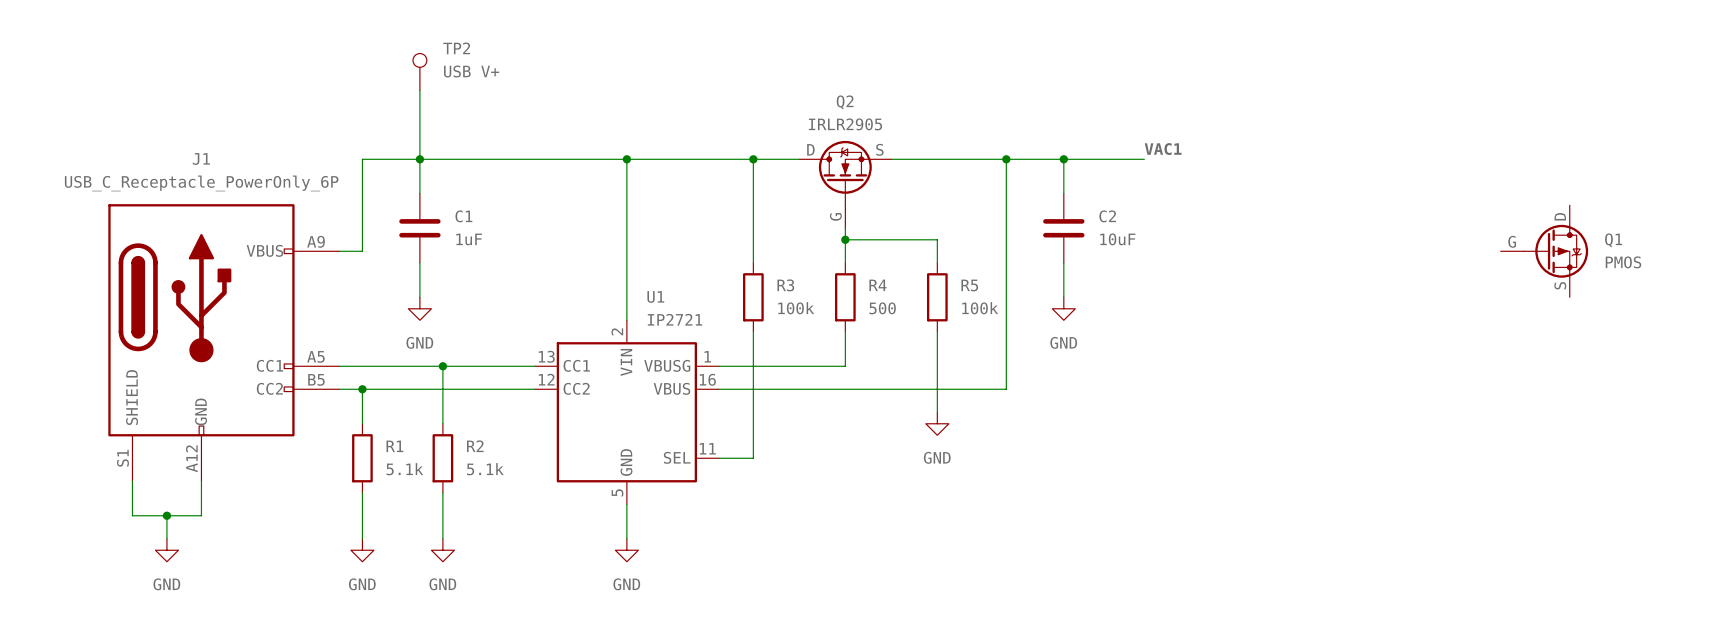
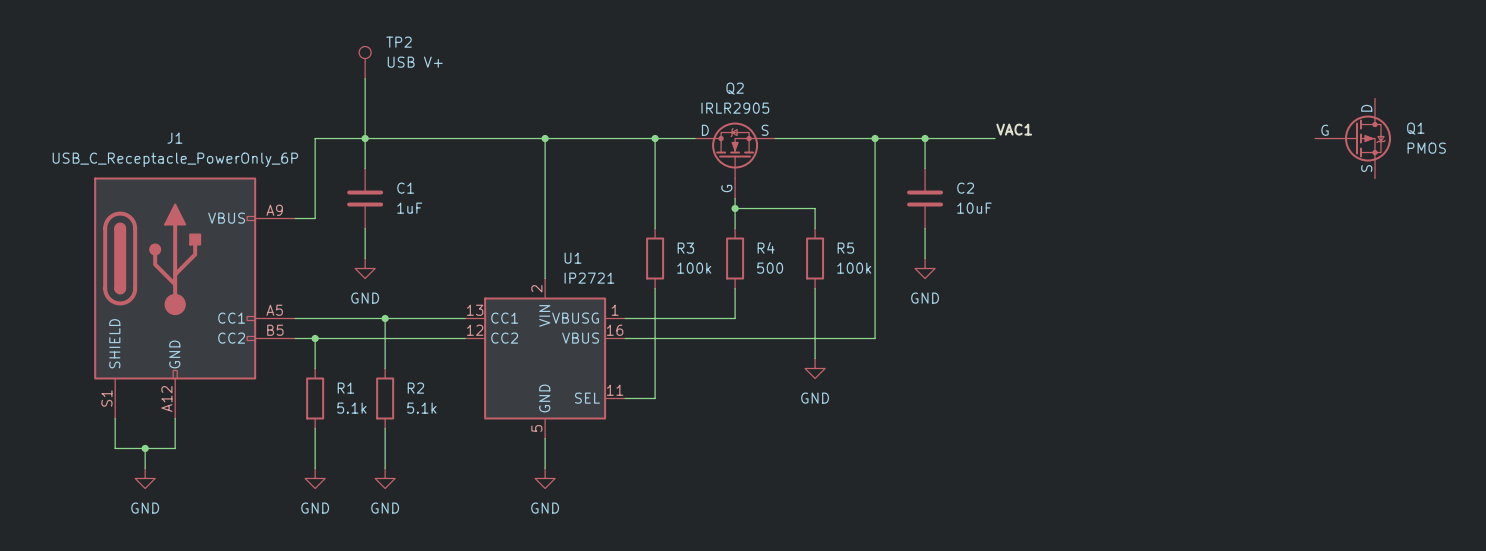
Q1 position: (1544, 251) -> (1353, 138)

